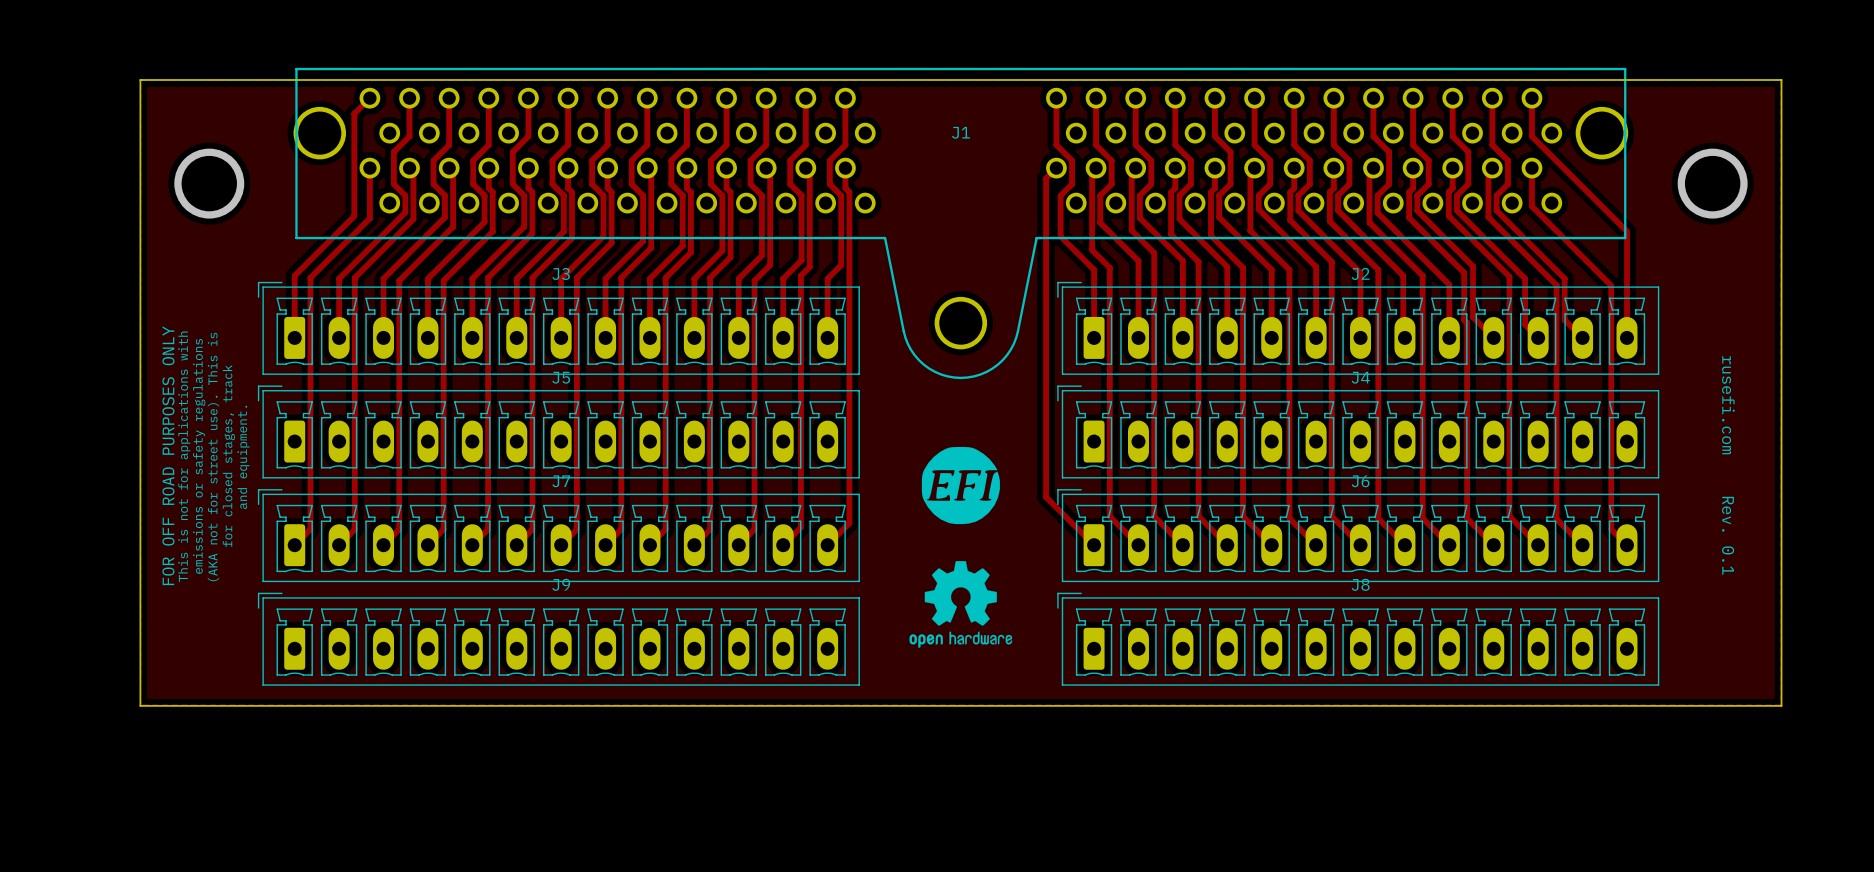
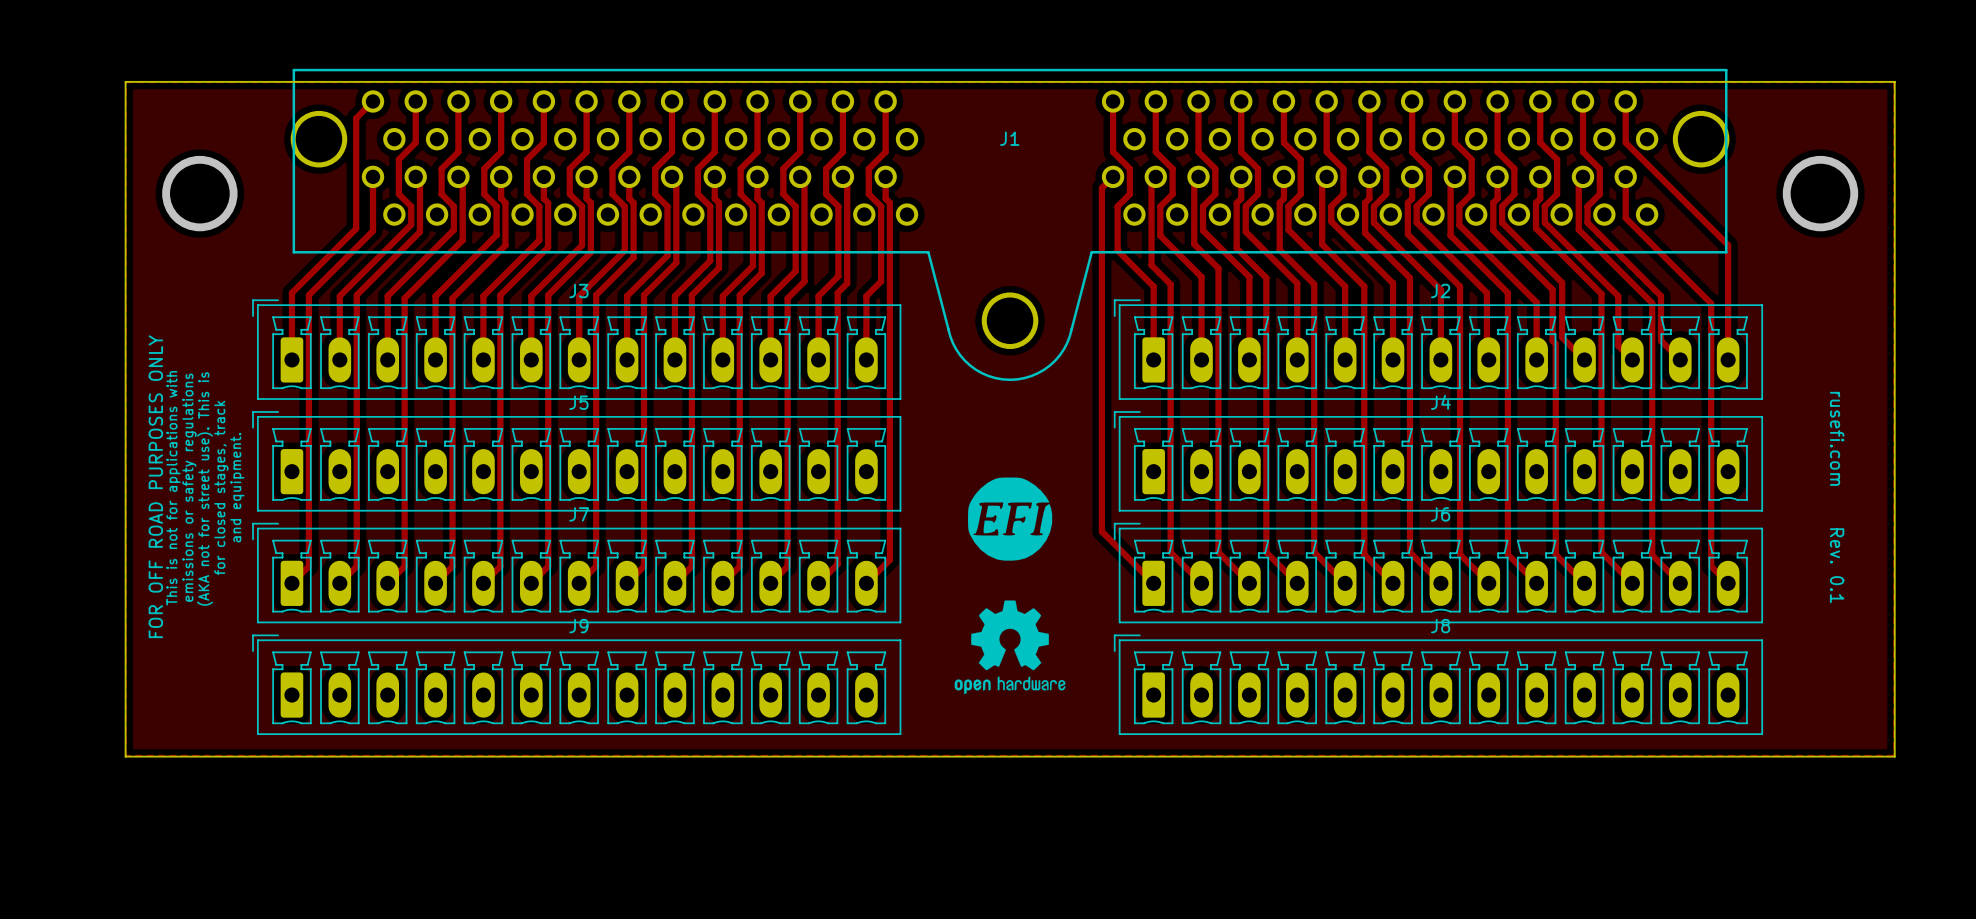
J1 footprint: [293, 67, 1629, 380] -> [290, 68, 1730, 382]

